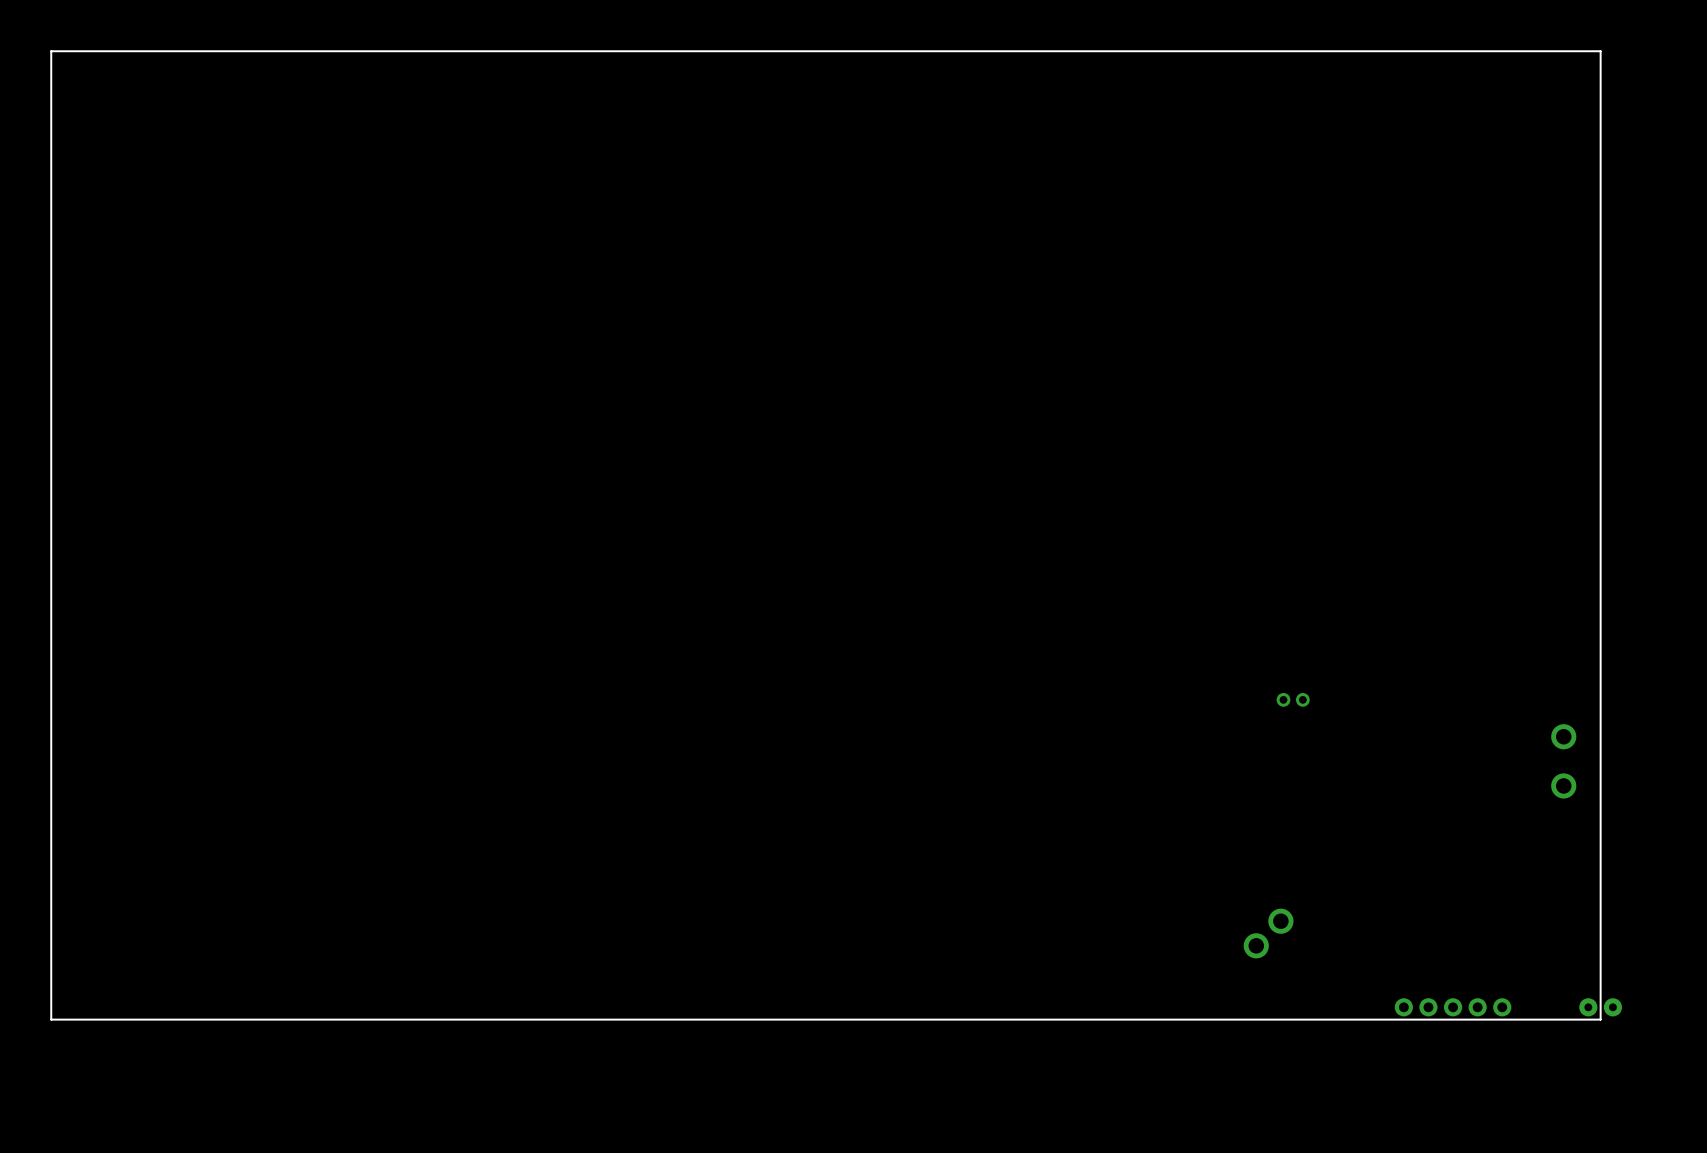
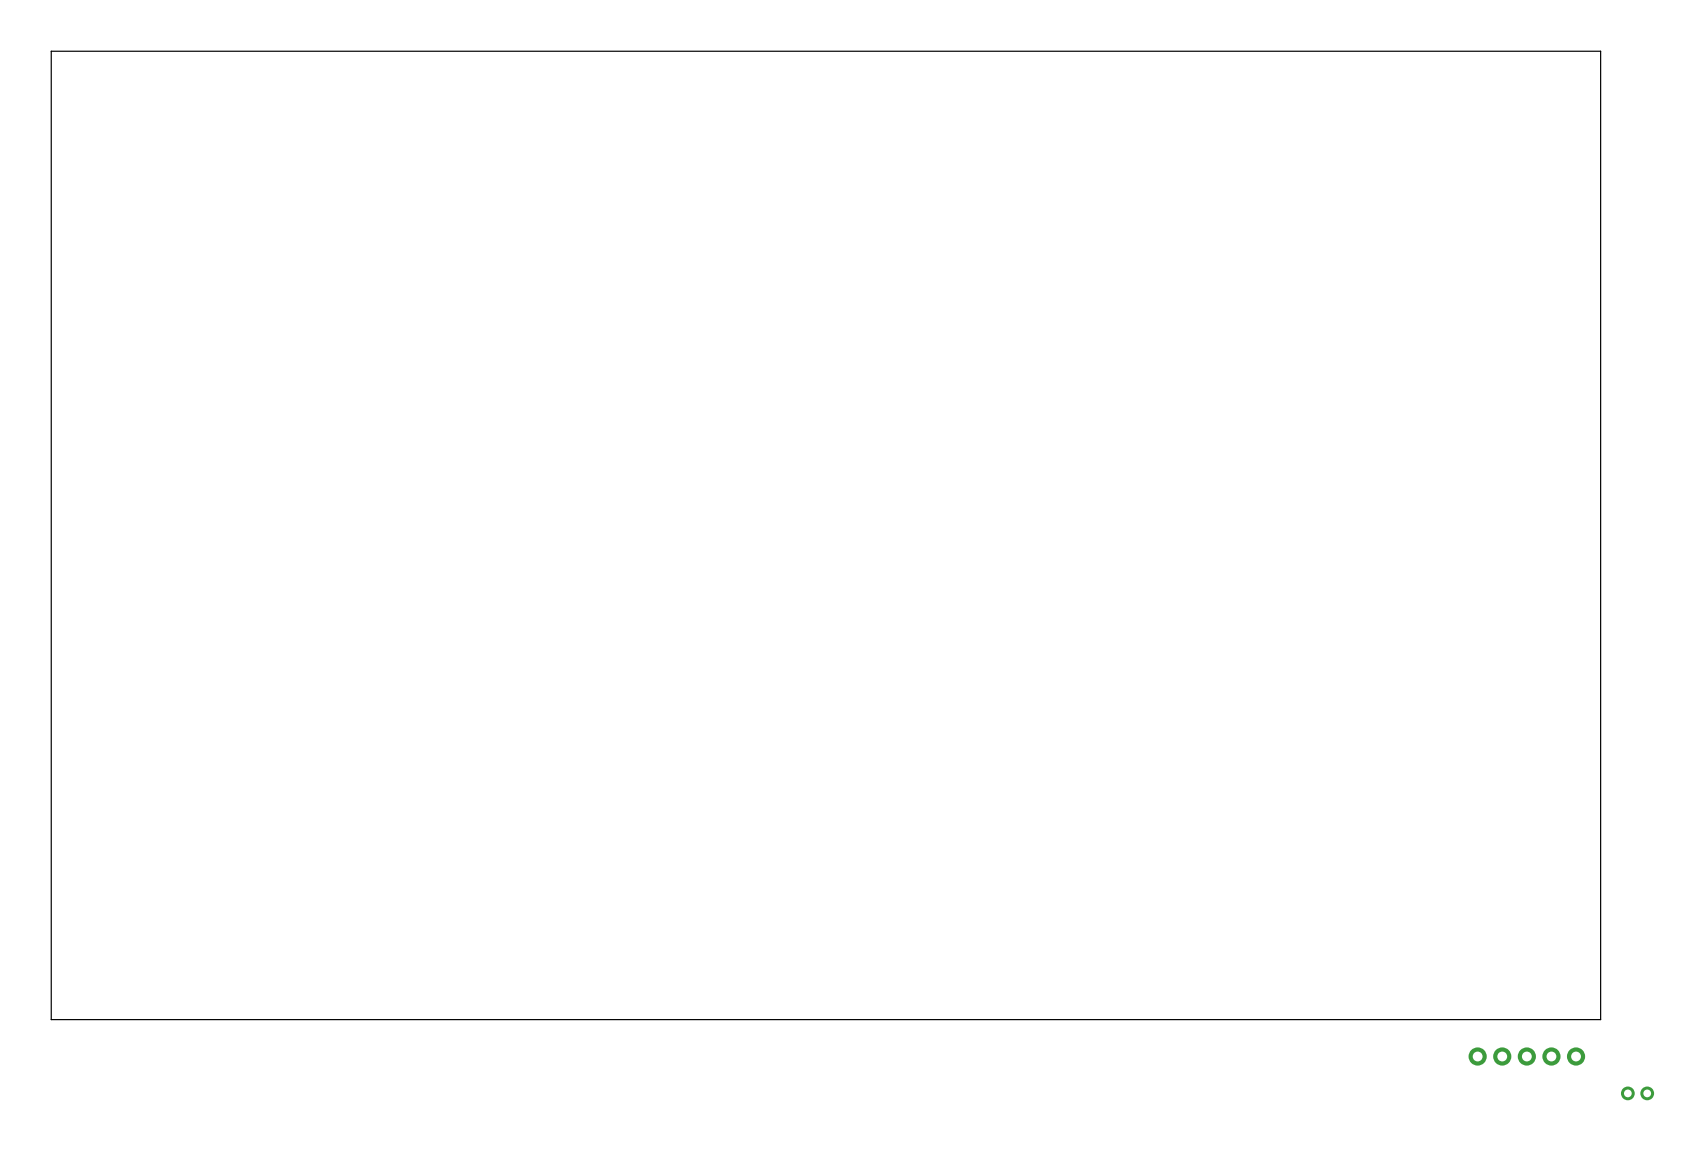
part: (1293, 699) -> none
part: (1563, 736) -> none
part: (1563, 785) -> none
part: (1280, 921) -> none
part: (1256, 945) -> none
part position: (1453, 1007) -> (1526, 1056)
part: (1600, 1007) -> none
part: none -> (1637, 1093)

